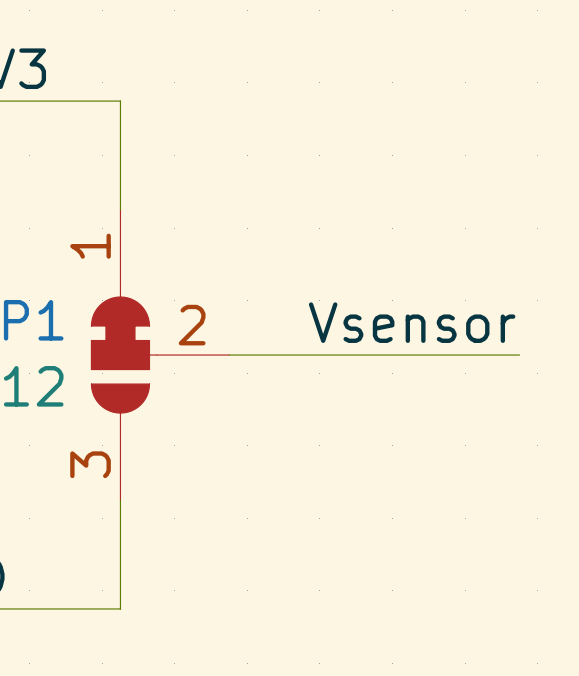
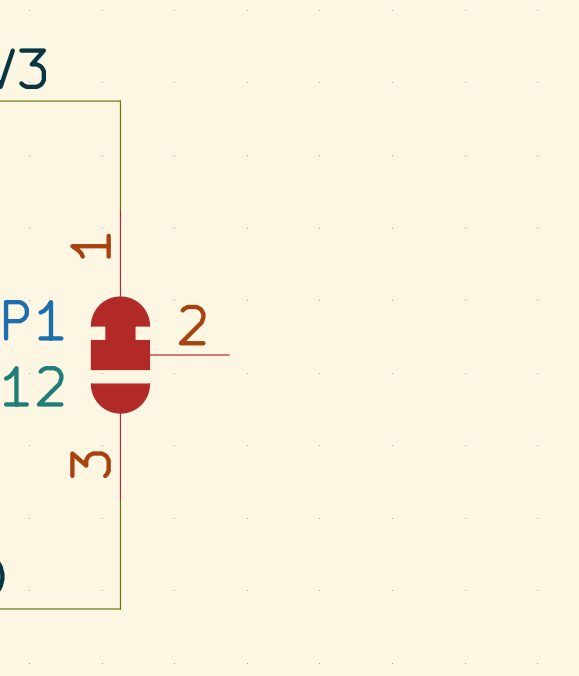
label: Vsensor (412, 322) -> none
wire: (229, 355) (519, 355) -> none

